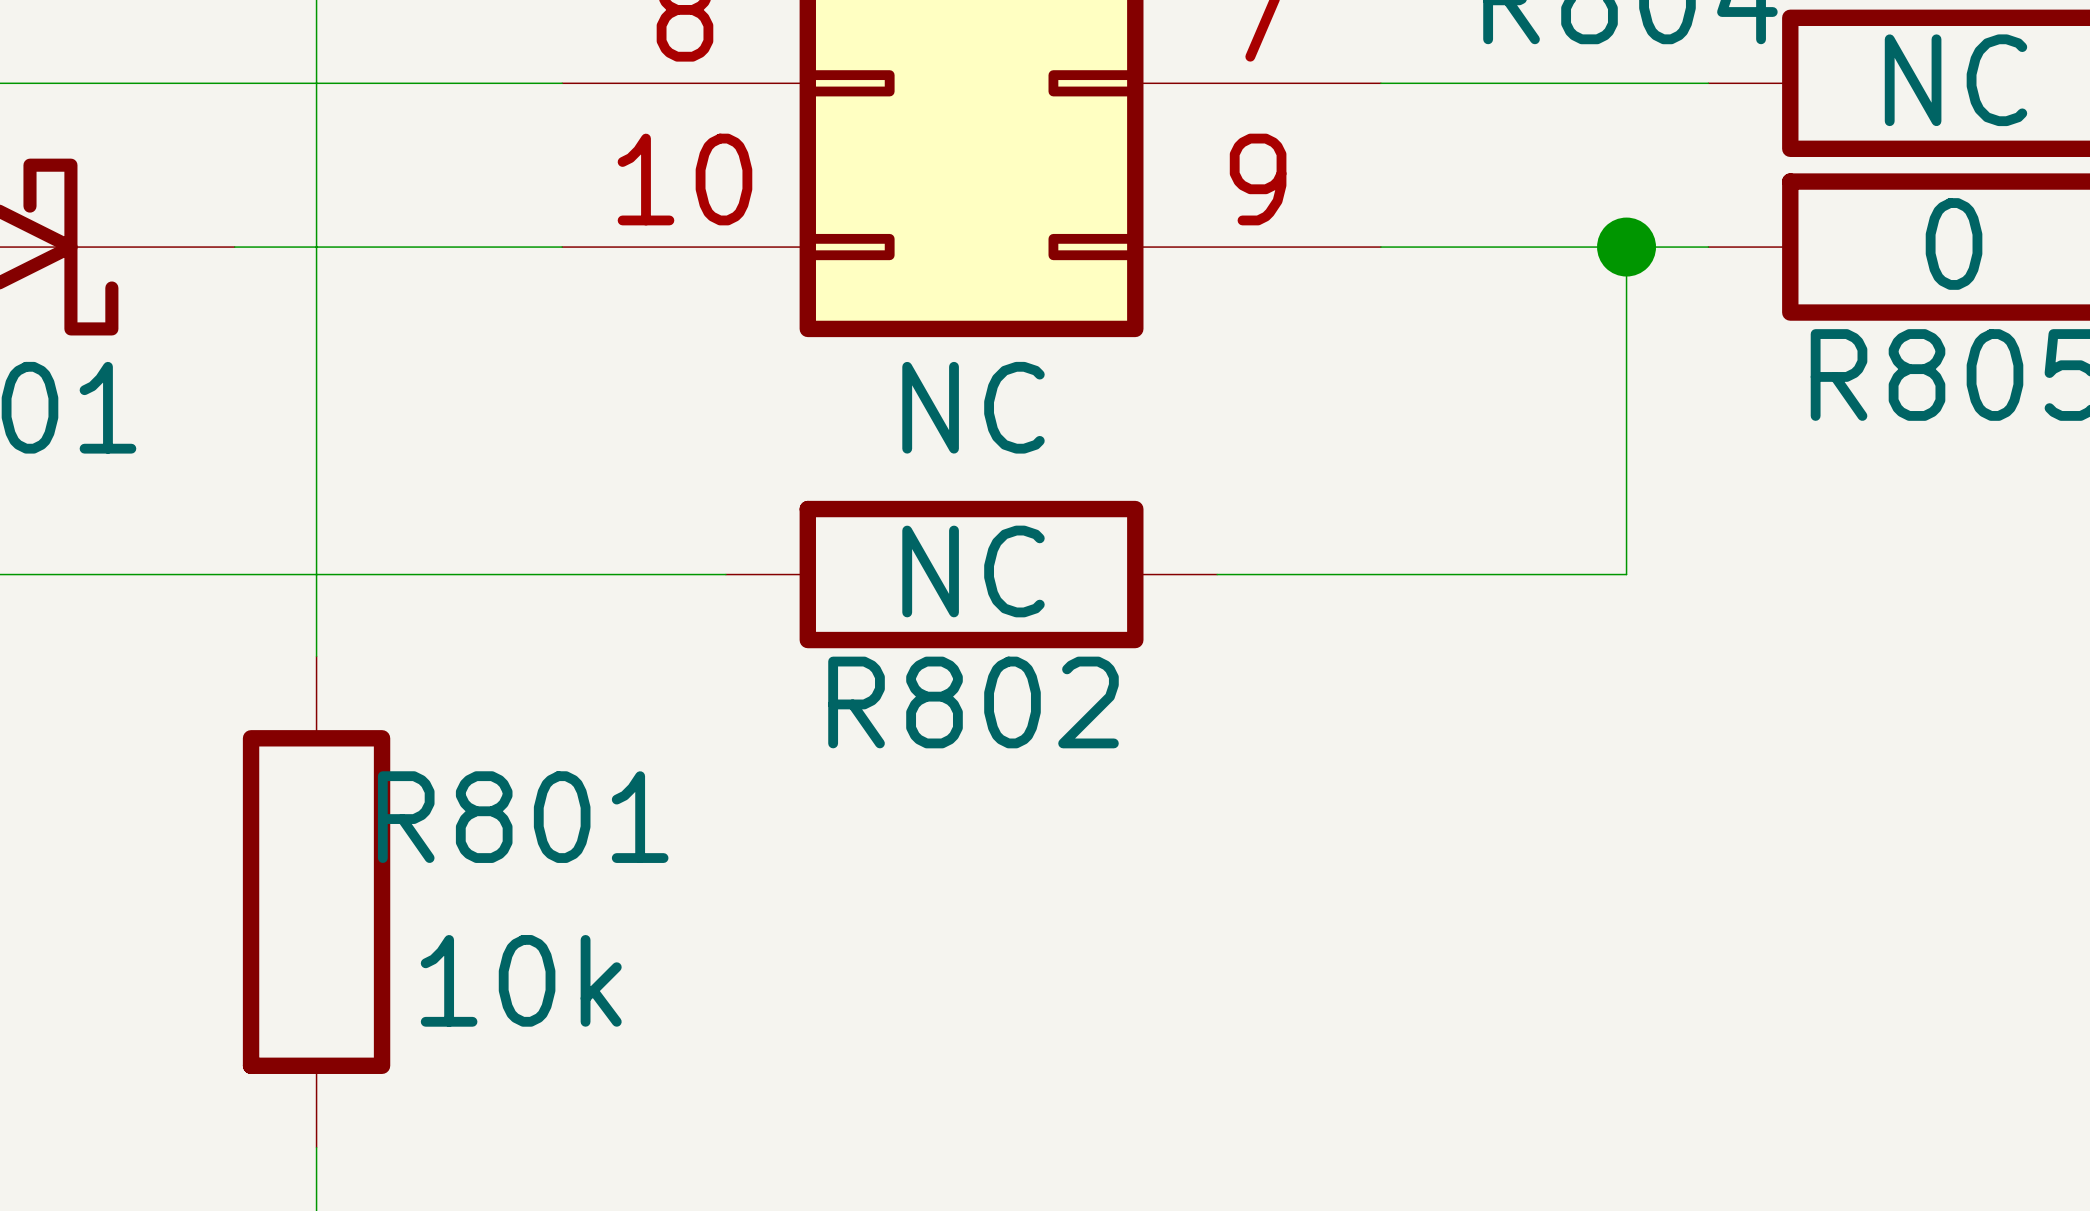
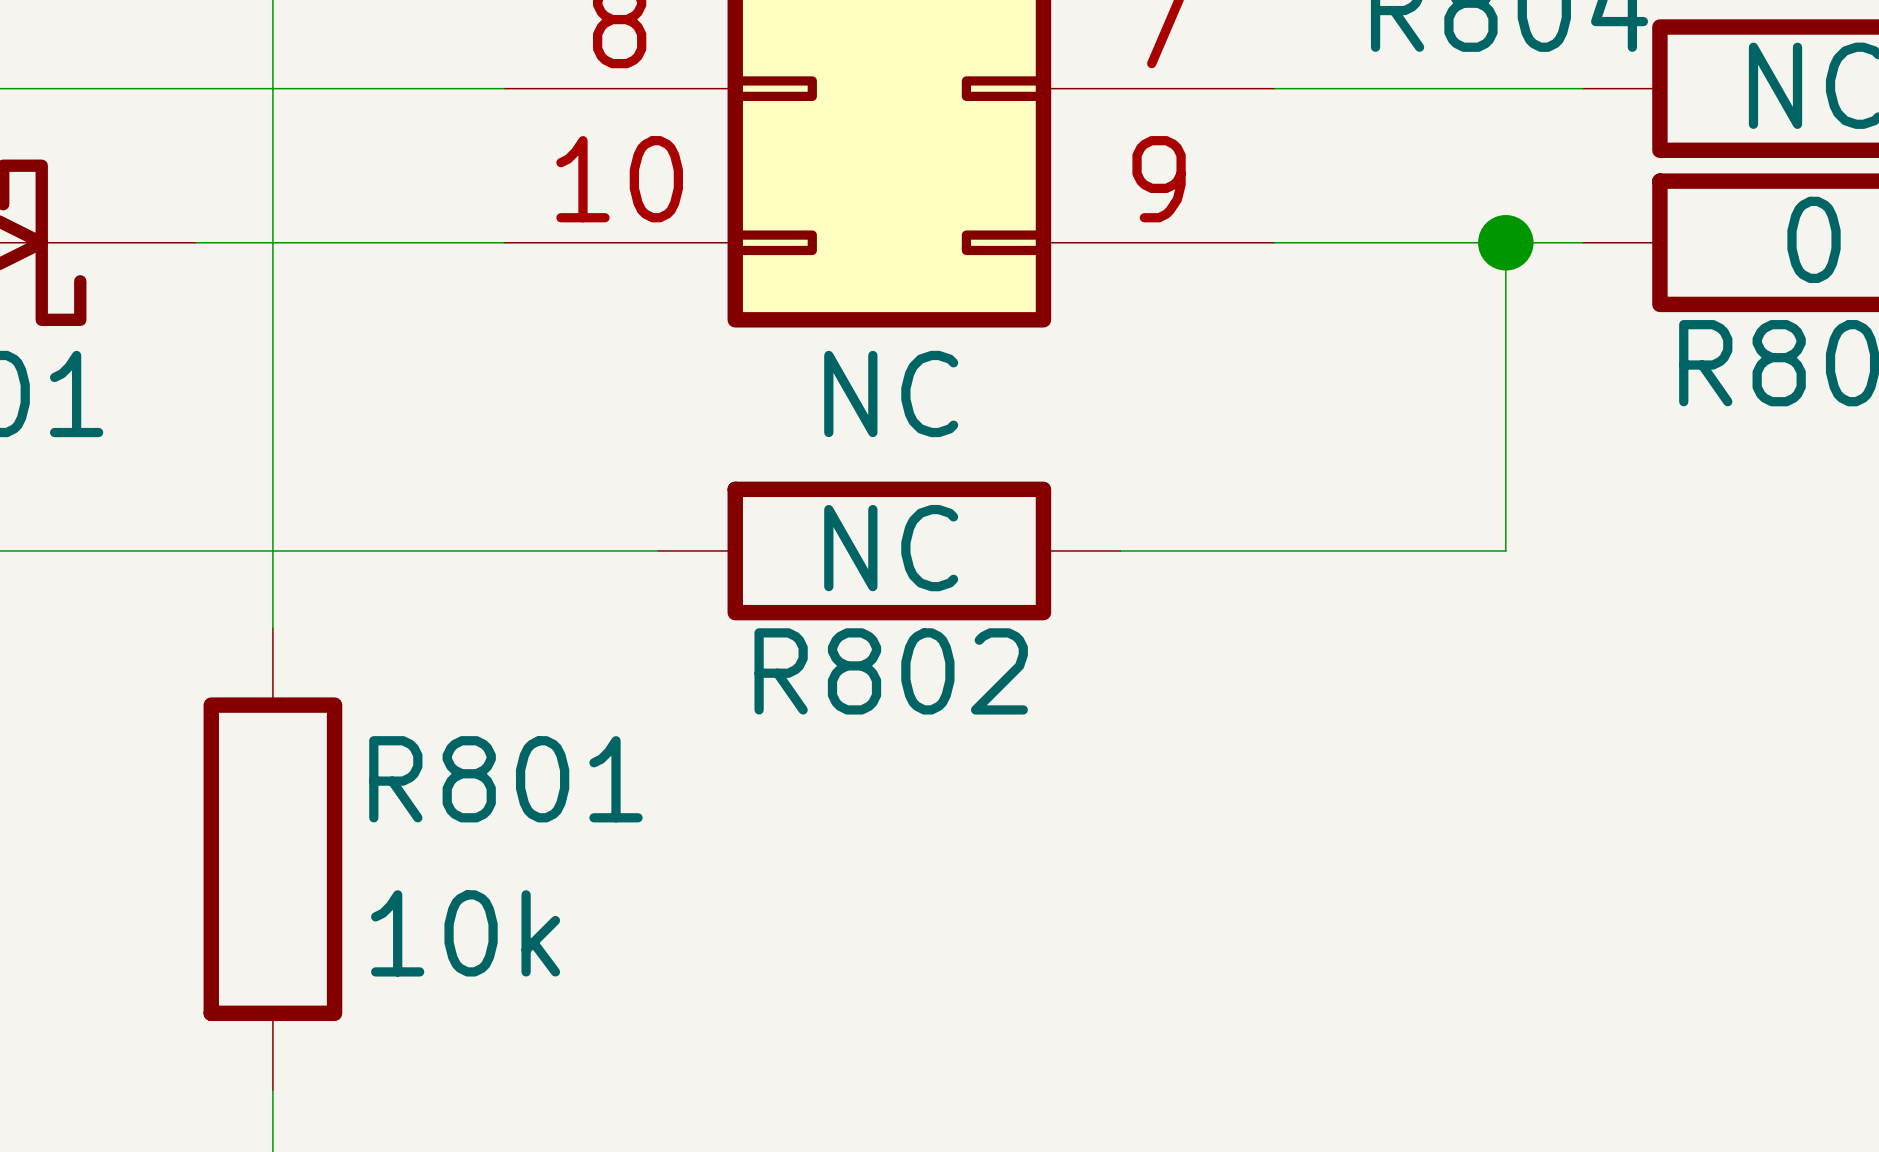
R801 name position: R801 (523, 817) -> R801 (505, 779)

